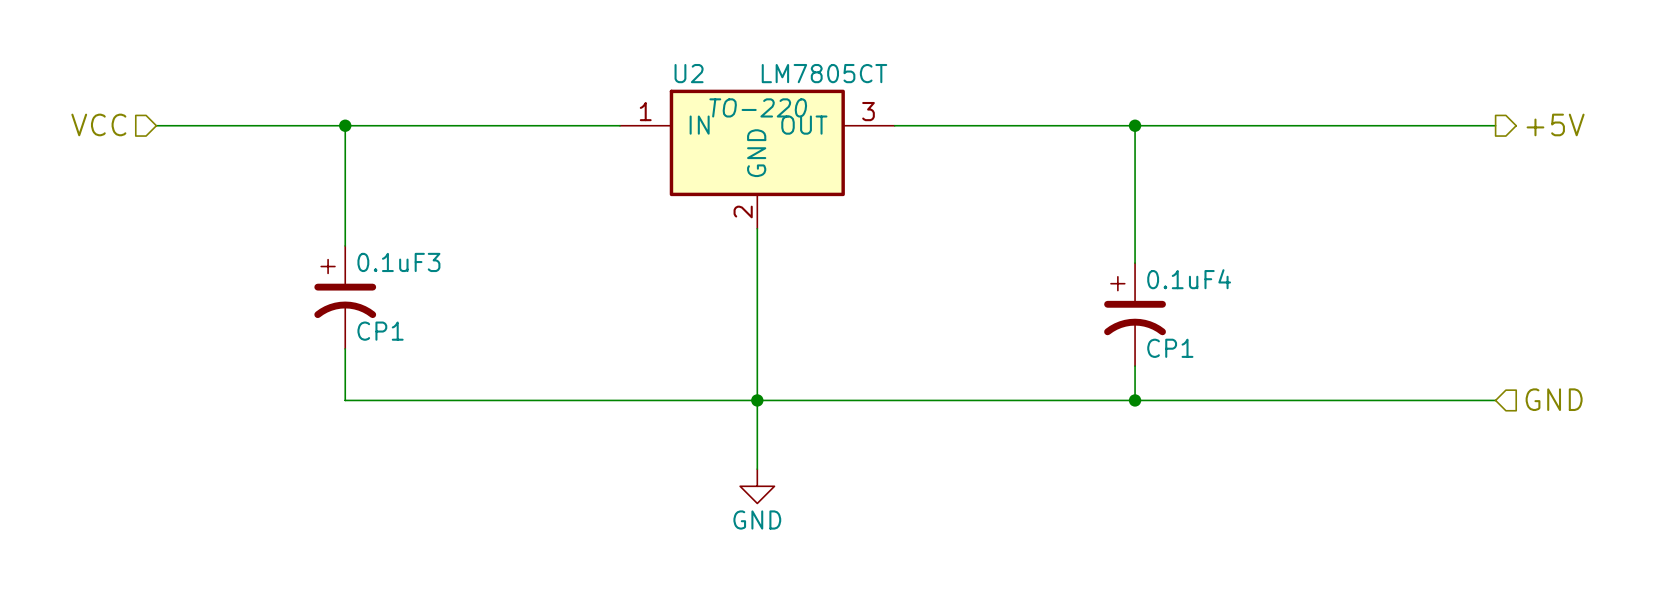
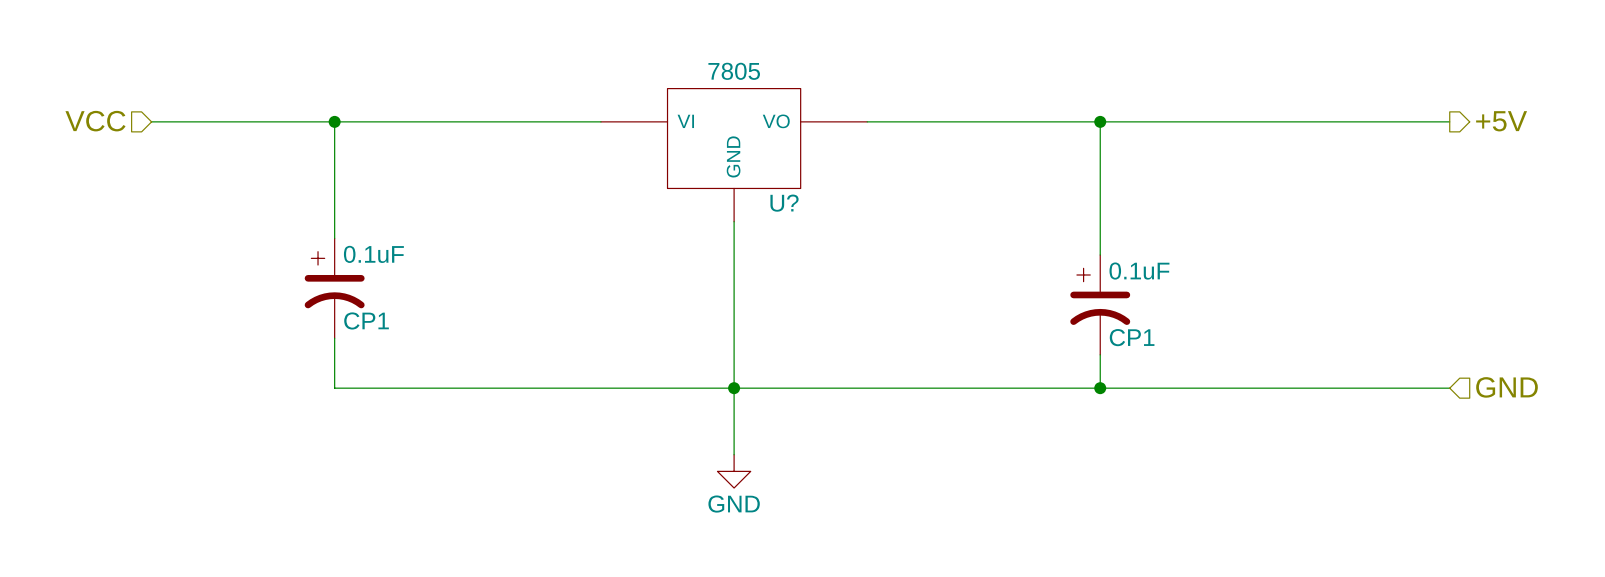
U2: LM7805CT (757, 159) -> none
U?: none -> 7805 (734, 155)
0.1uF3 name: 0.1uF3 (398, 262) -> 0.1uF (373, 254)
0.1uF4 name: 0.1uF4 (1189, 279) -> 0.1uF (1139, 271)

